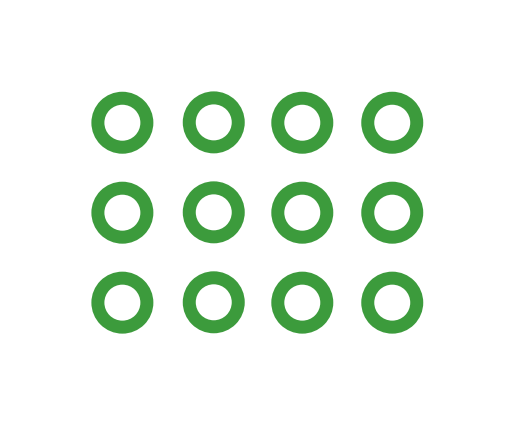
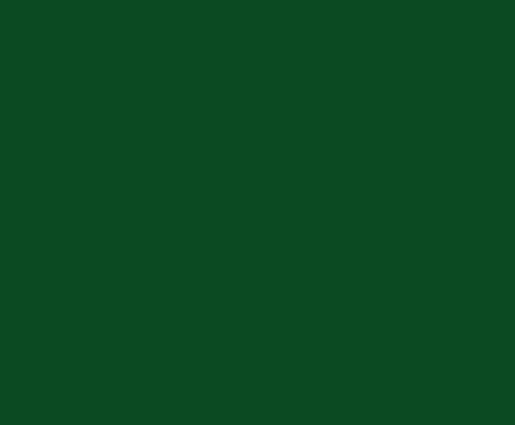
part: (122, 212) -> none
part: (213, 212) -> none
part: (302, 212) -> none
part: (392, 212) -> none

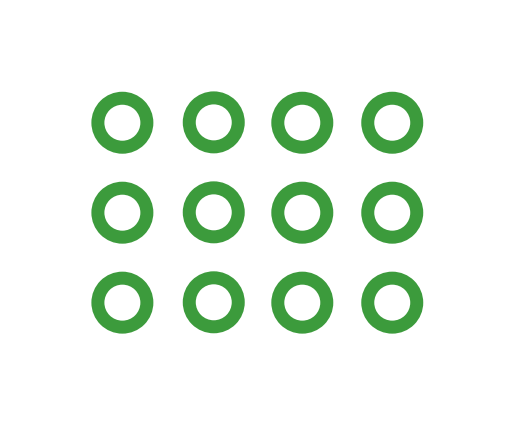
part: none -> (122, 212)
part: none -> (213, 212)
part: none -> (302, 212)
part: none -> (392, 212)

